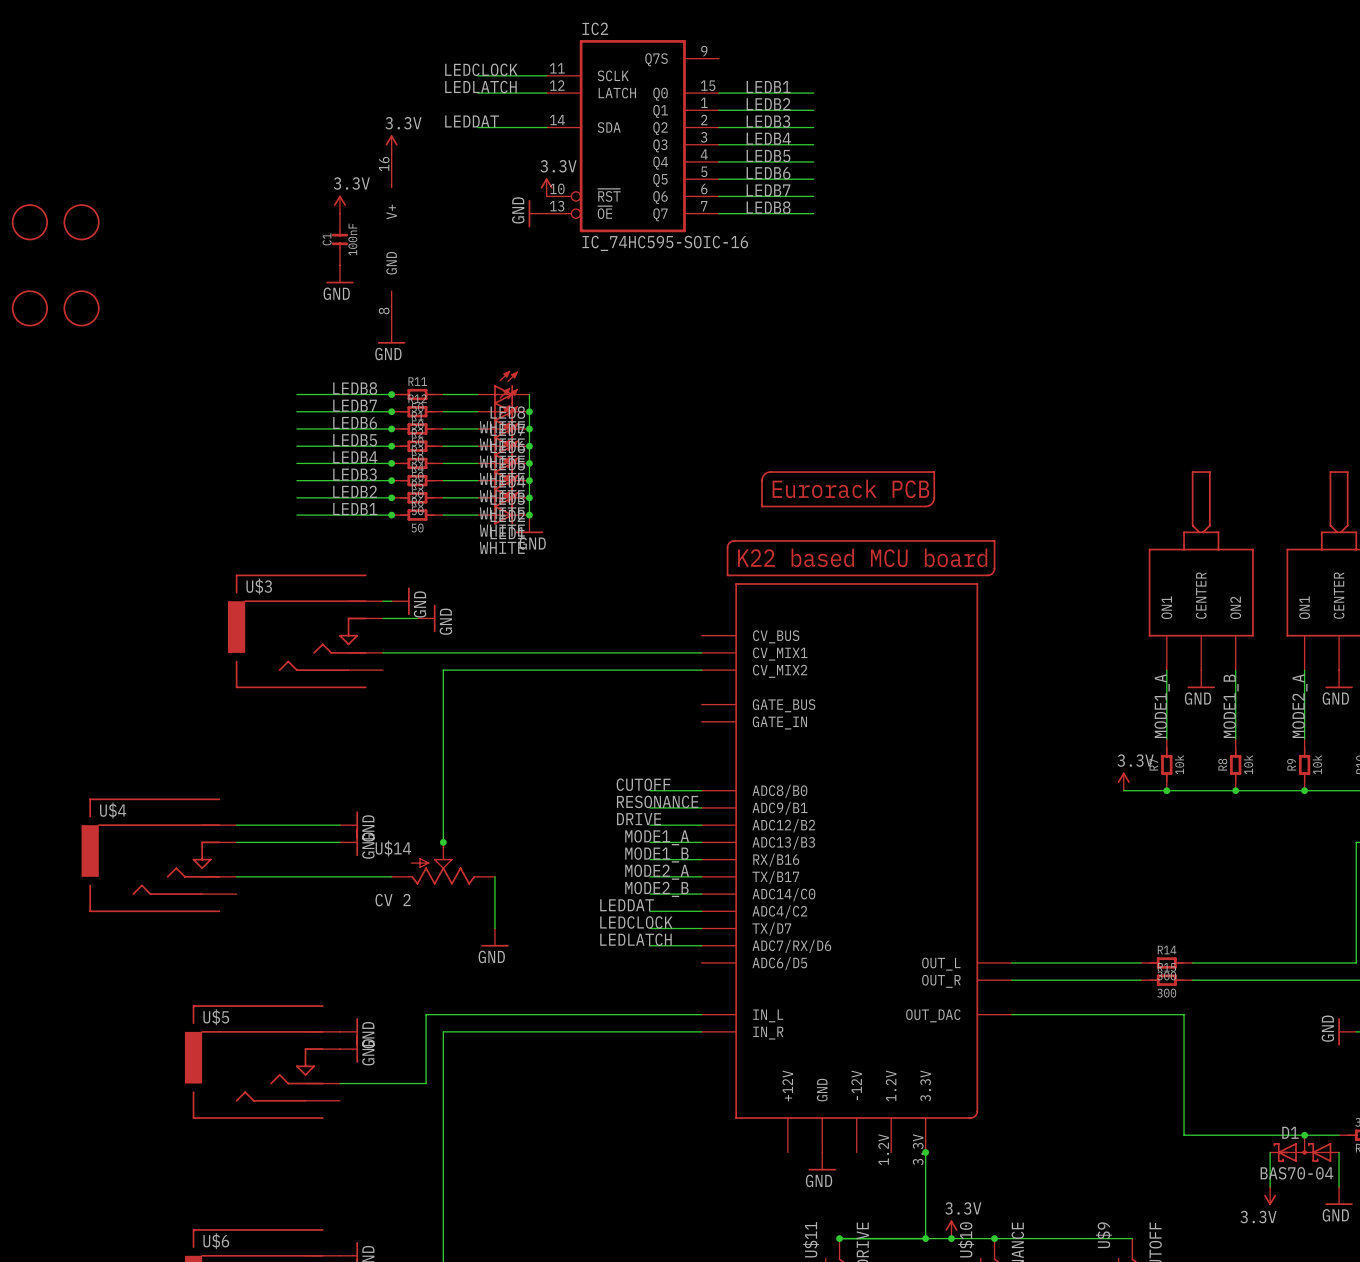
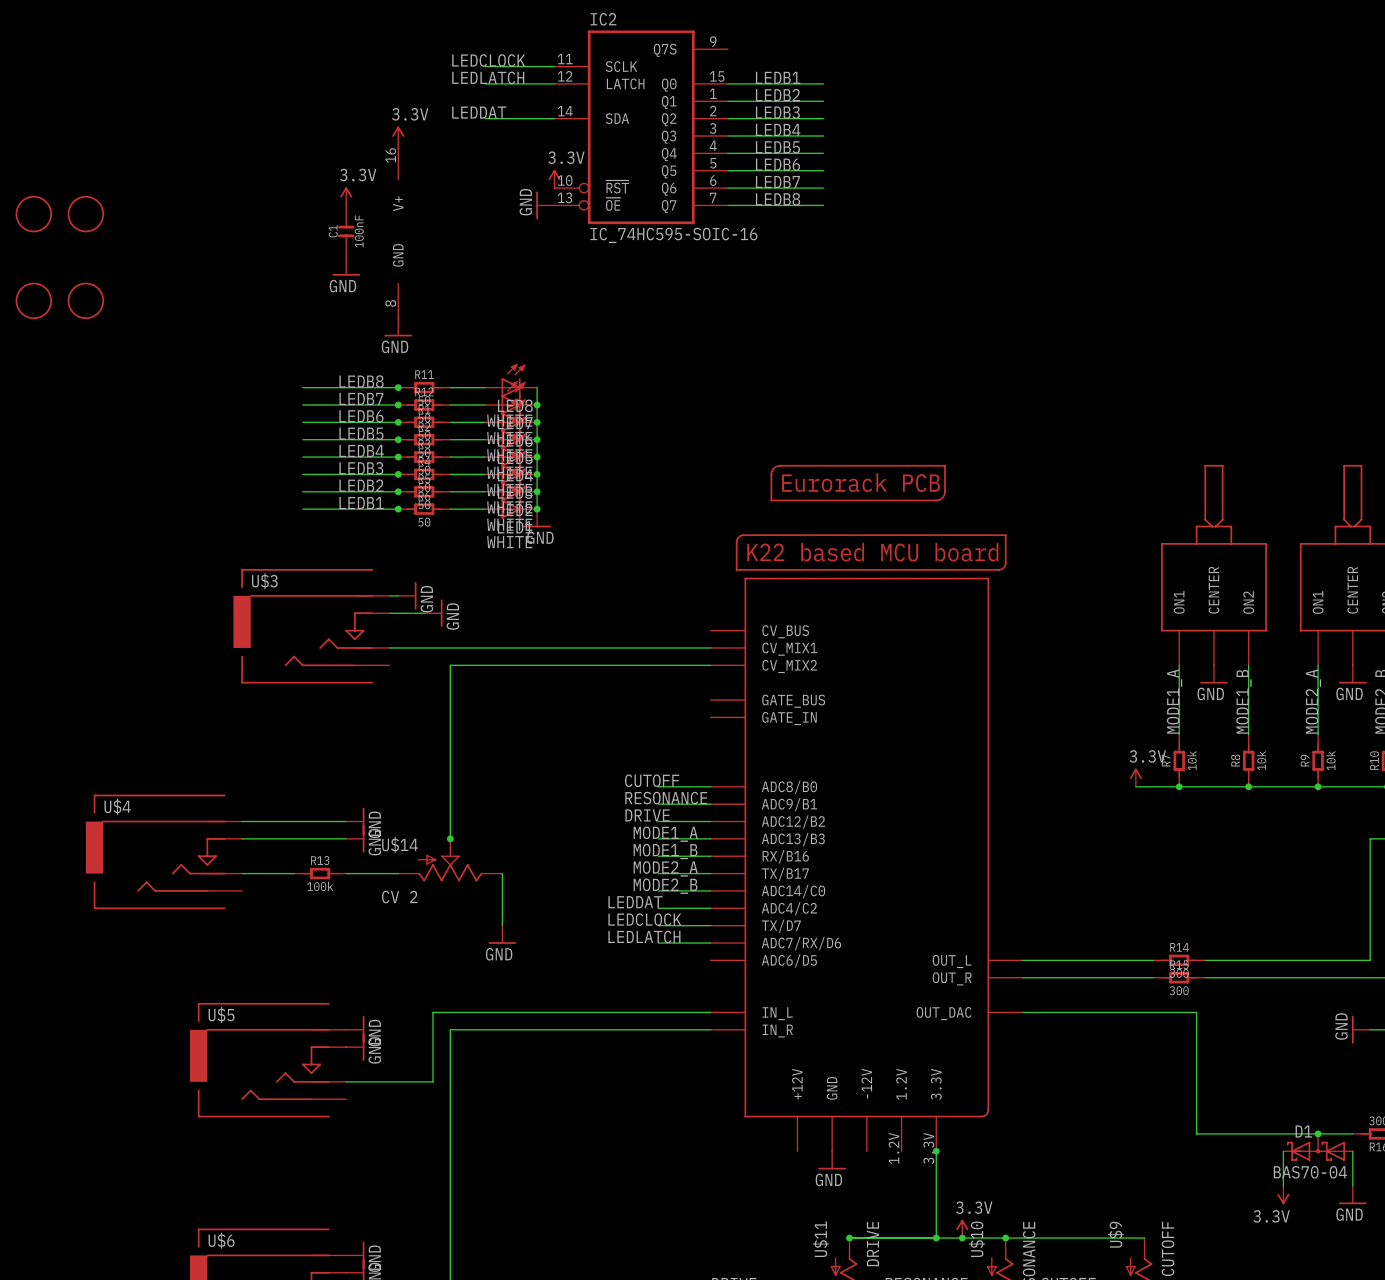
R13: none -> 100k (320, 873)

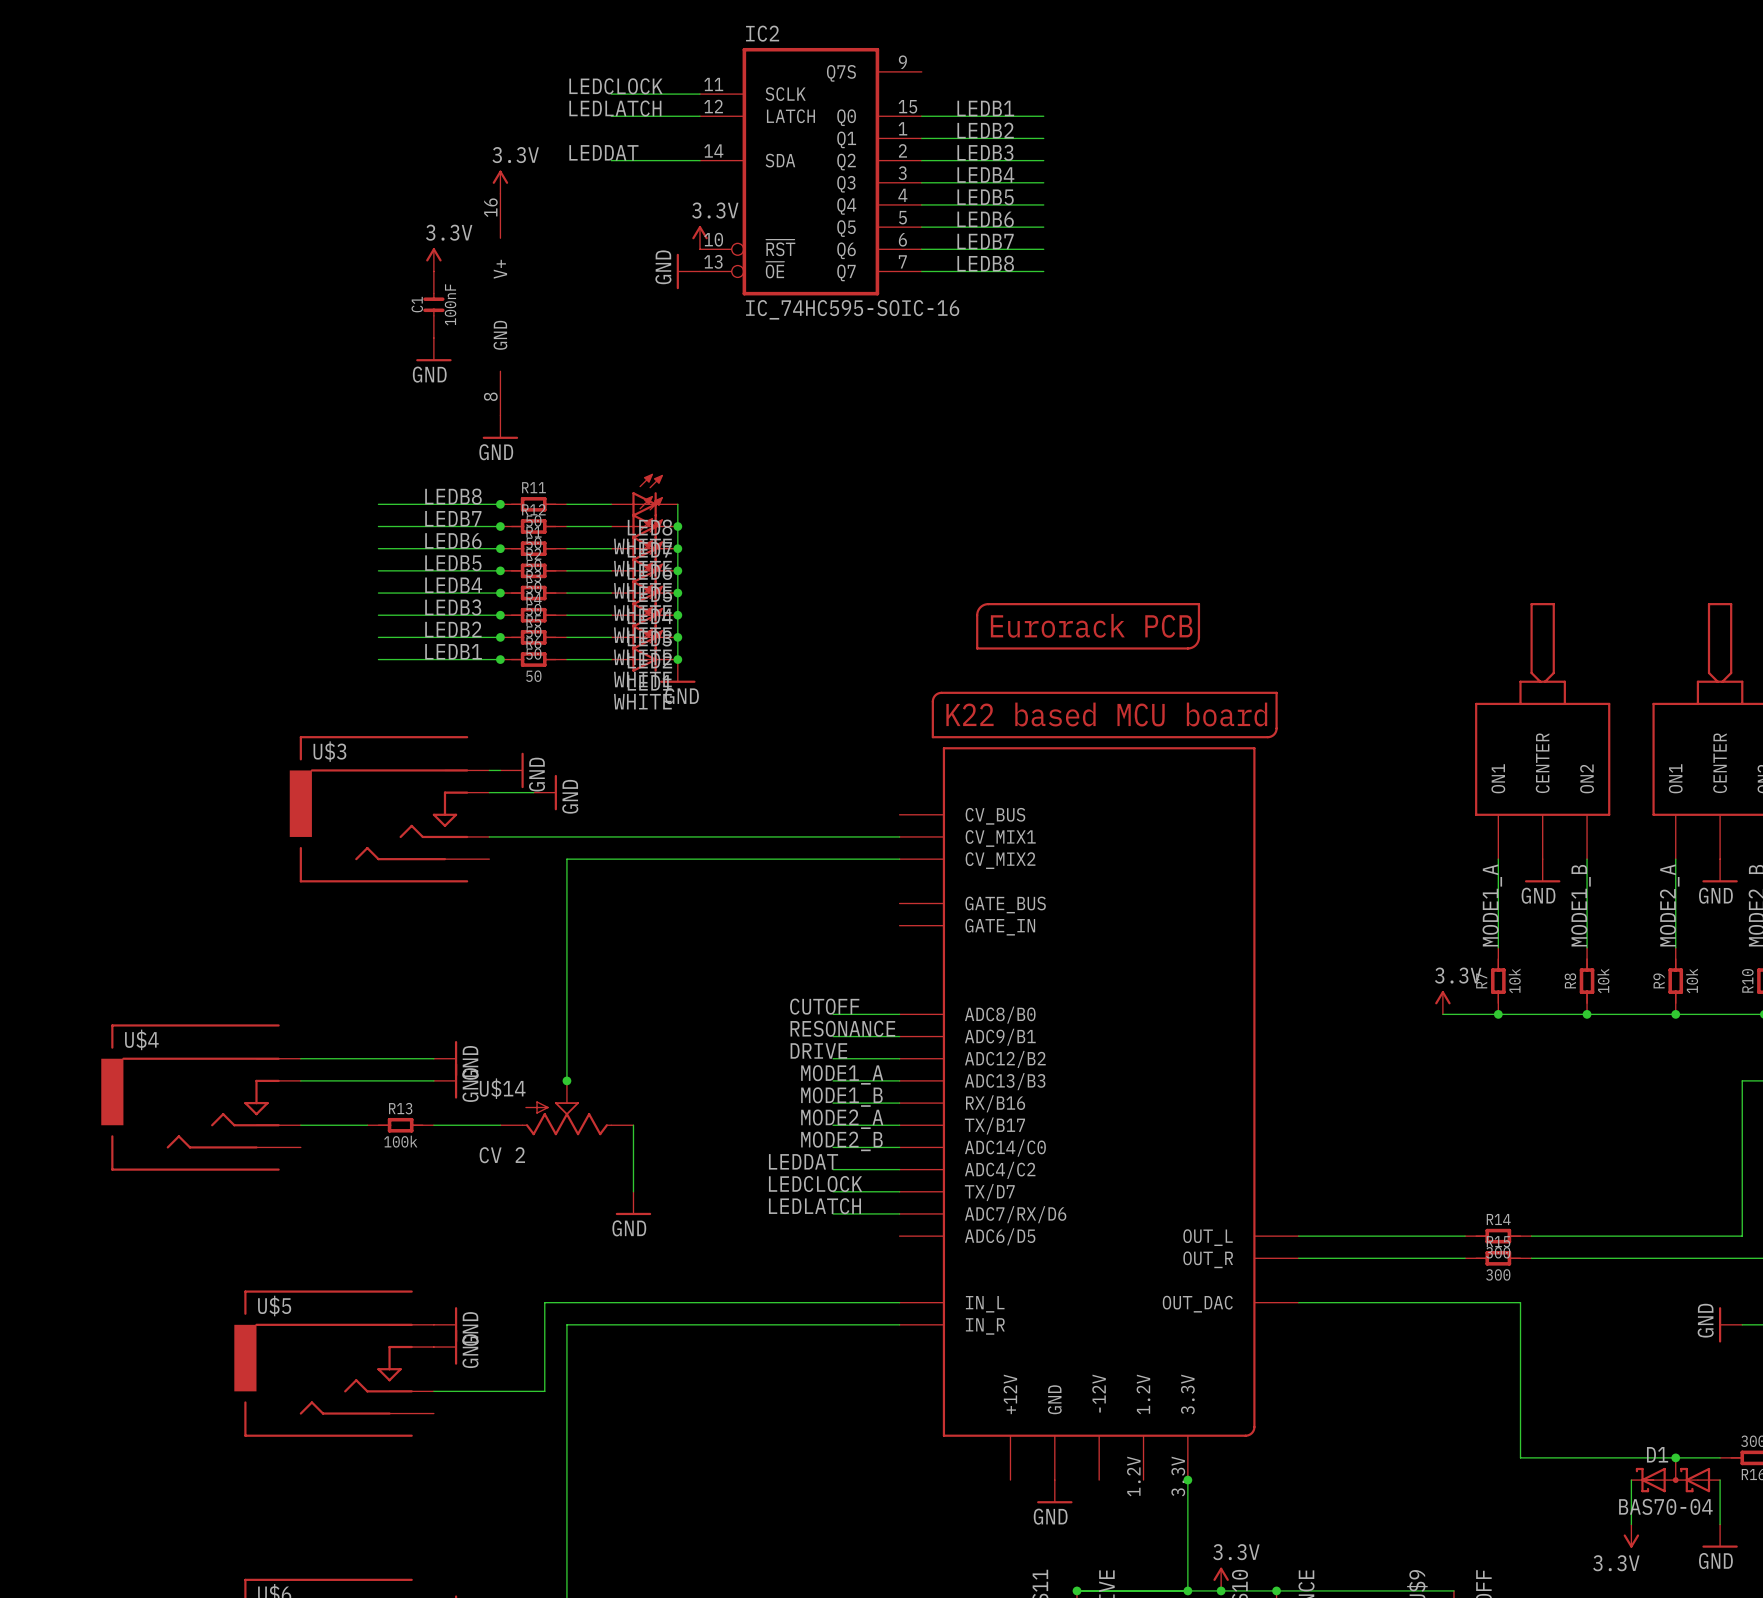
part: (33, 214) -> none
part: (85, 214) -> none
part: (33, 300) -> none
part: (85, 300) -> none

